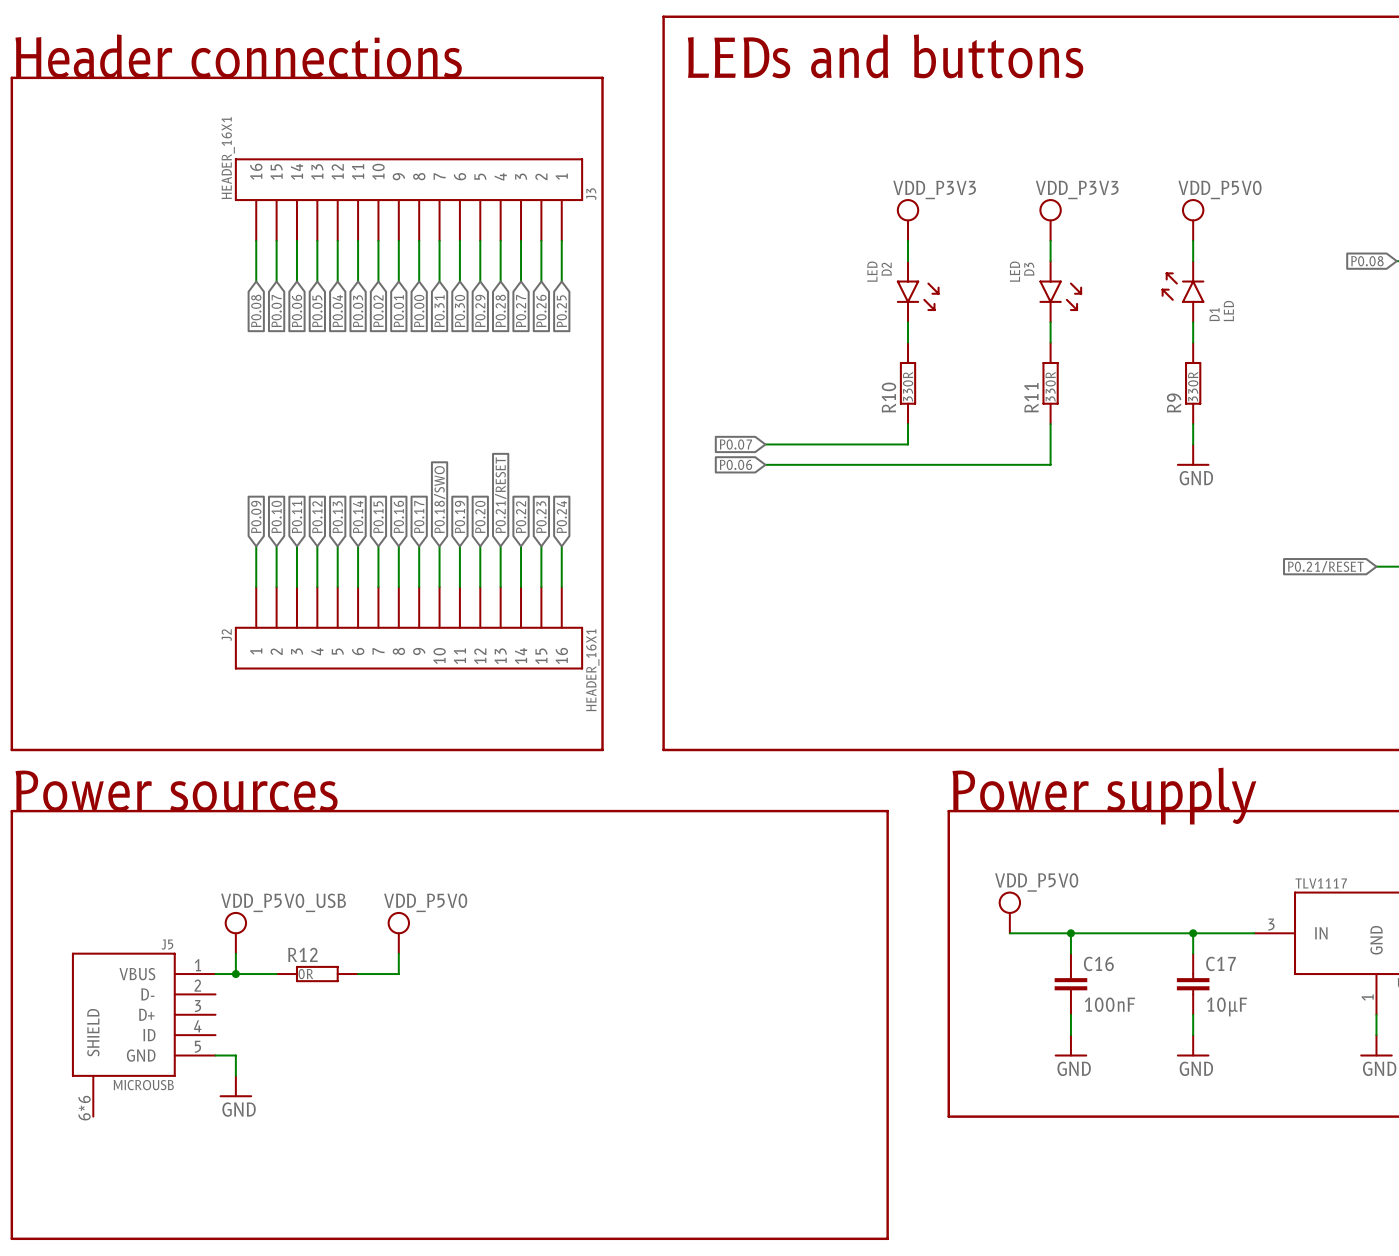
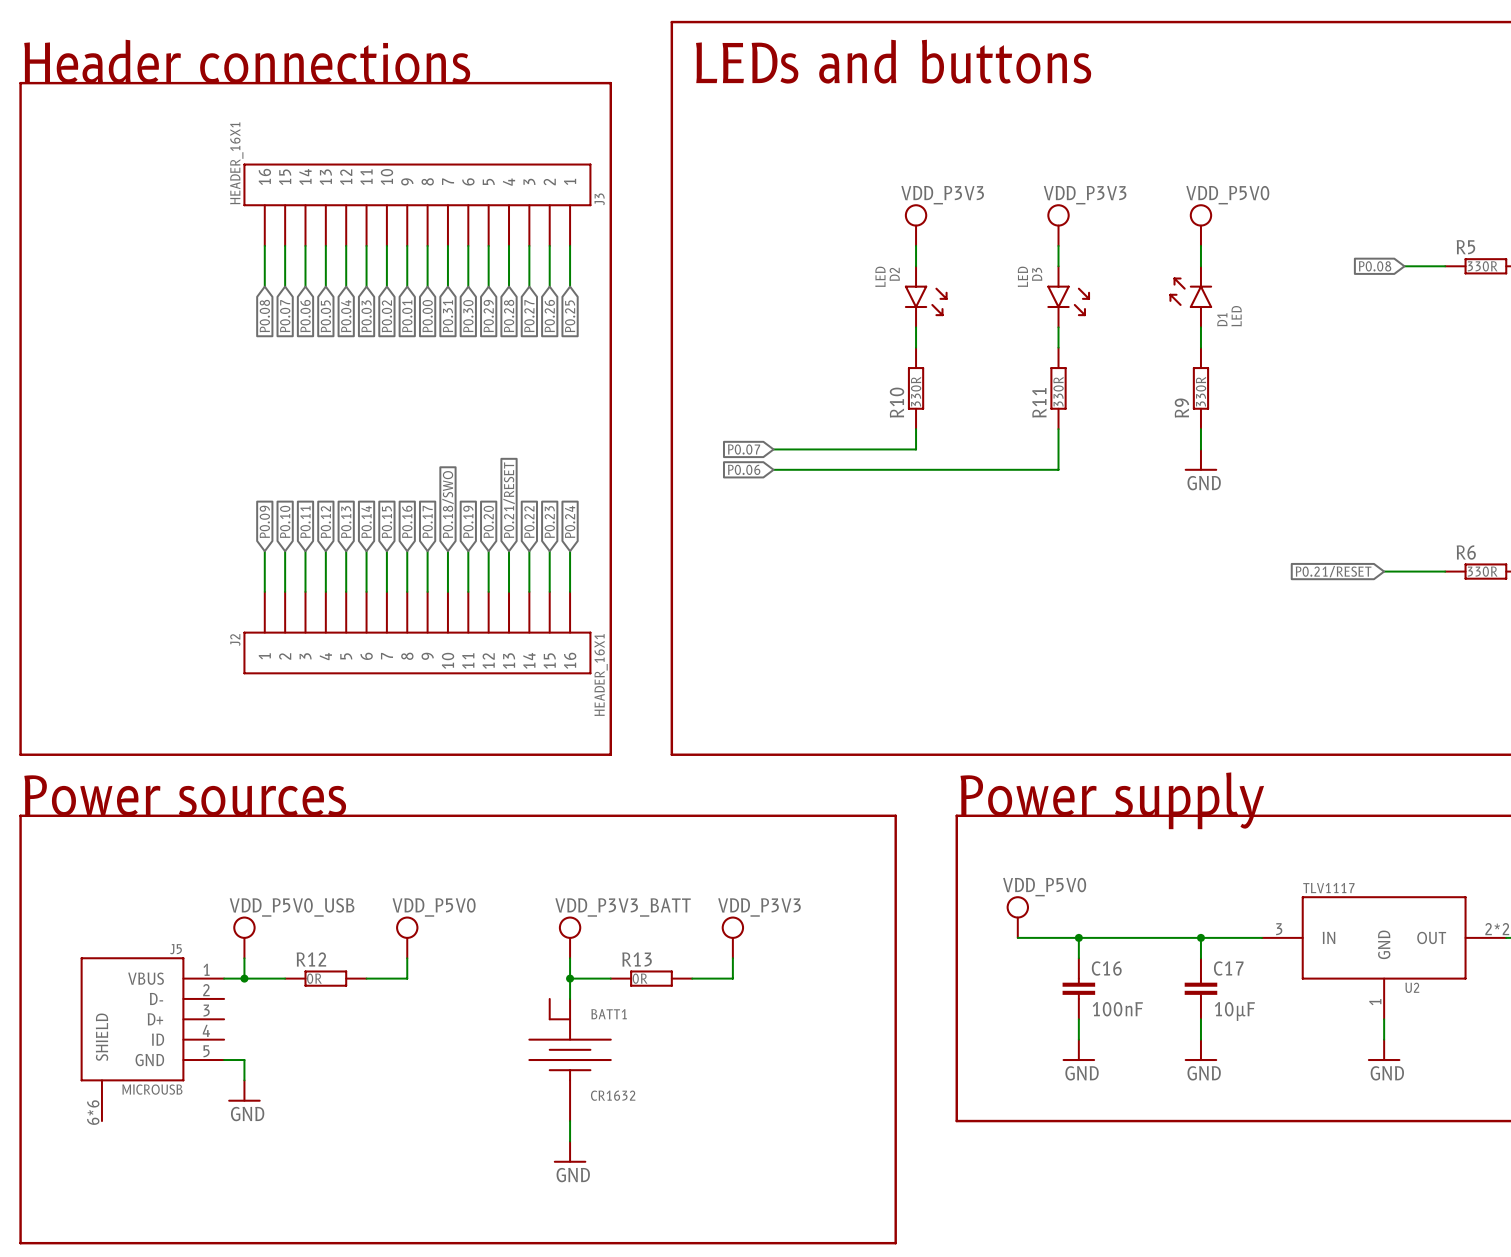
power symbol: none -> VDD_P3V3_BATT (570, 937)
power symbol: none -> VDD_P3V3 (732, 937)
wire: none -> (570, 958) (570, 998)
wire: none -> (732, 958) (732, 978) (692, 978)
wire: none -> (570, 978) (610, 978)
junction: none -> (570, 978)
R13: none -> 0R (651, 978)
BATT1: none -> CR1632 (570, 1060)
wire: none -> (570, 1121) (570, 1141)
power symbol: none -> GND (570, 1152)

